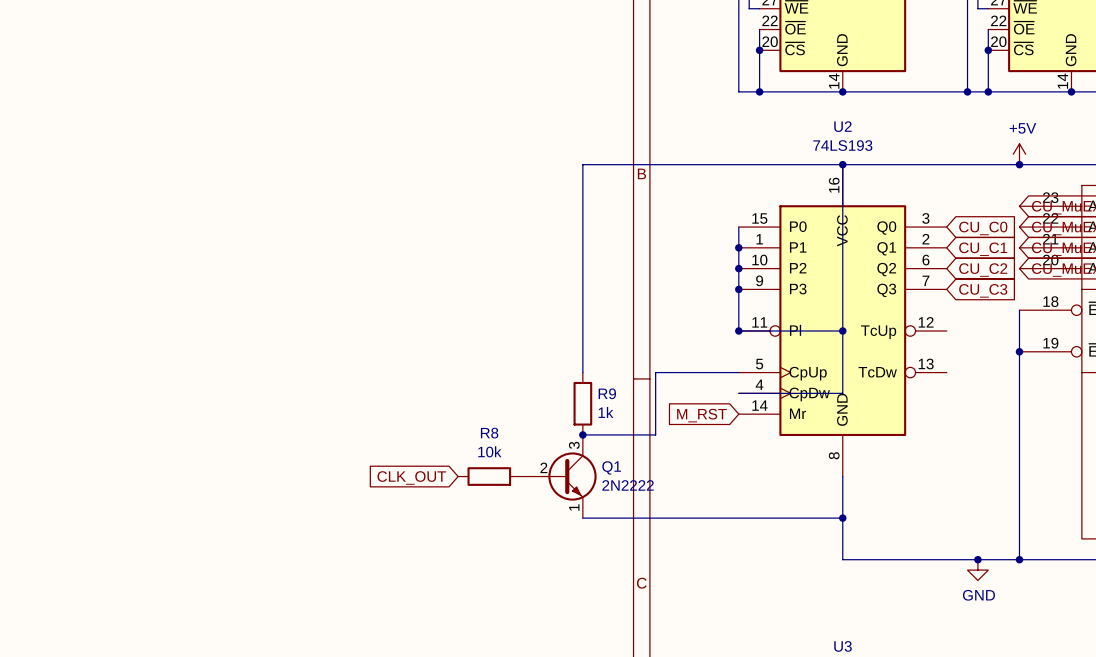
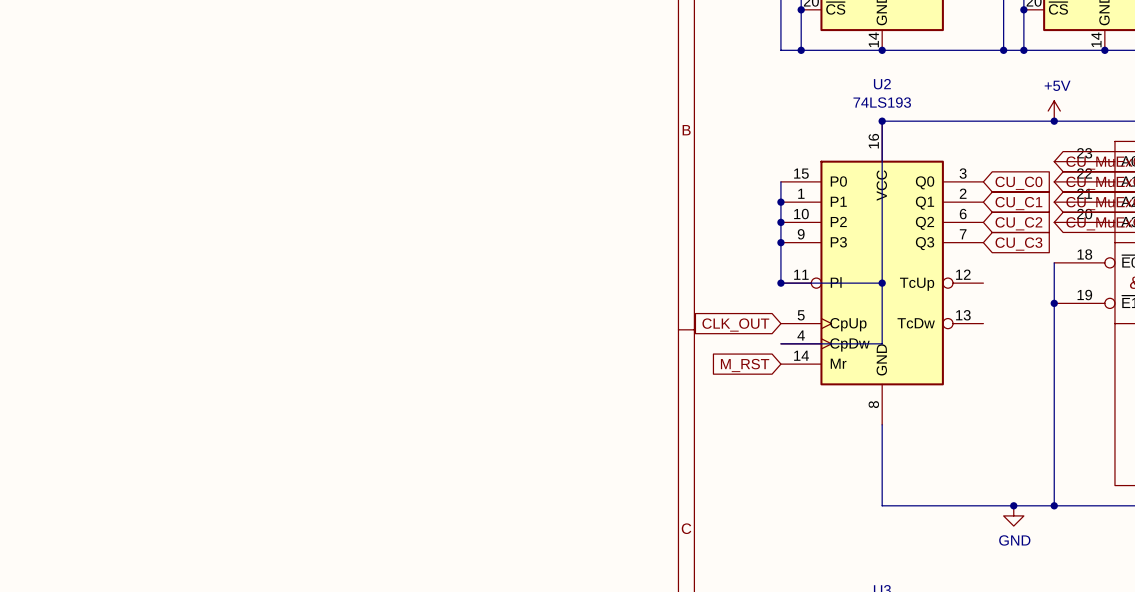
wire: (842, 164) (582, 164) (582, 372) -> none
wire: (738, 372) (655, 372) (655, 434) (582, 434) -> none
global label: none -> CLK_OUT (735, 325)
R9: 1k (582, 403) -> none
junction: (582, 434) -> none
R8: 10k (489, 476) -> none
Q1: 2N2222 (558, 476) -> none
global label: CLK_OUT (411, 477) -> none
wire: (582, 518) (842, 518) -> none
junction: (842, 518) -> none

